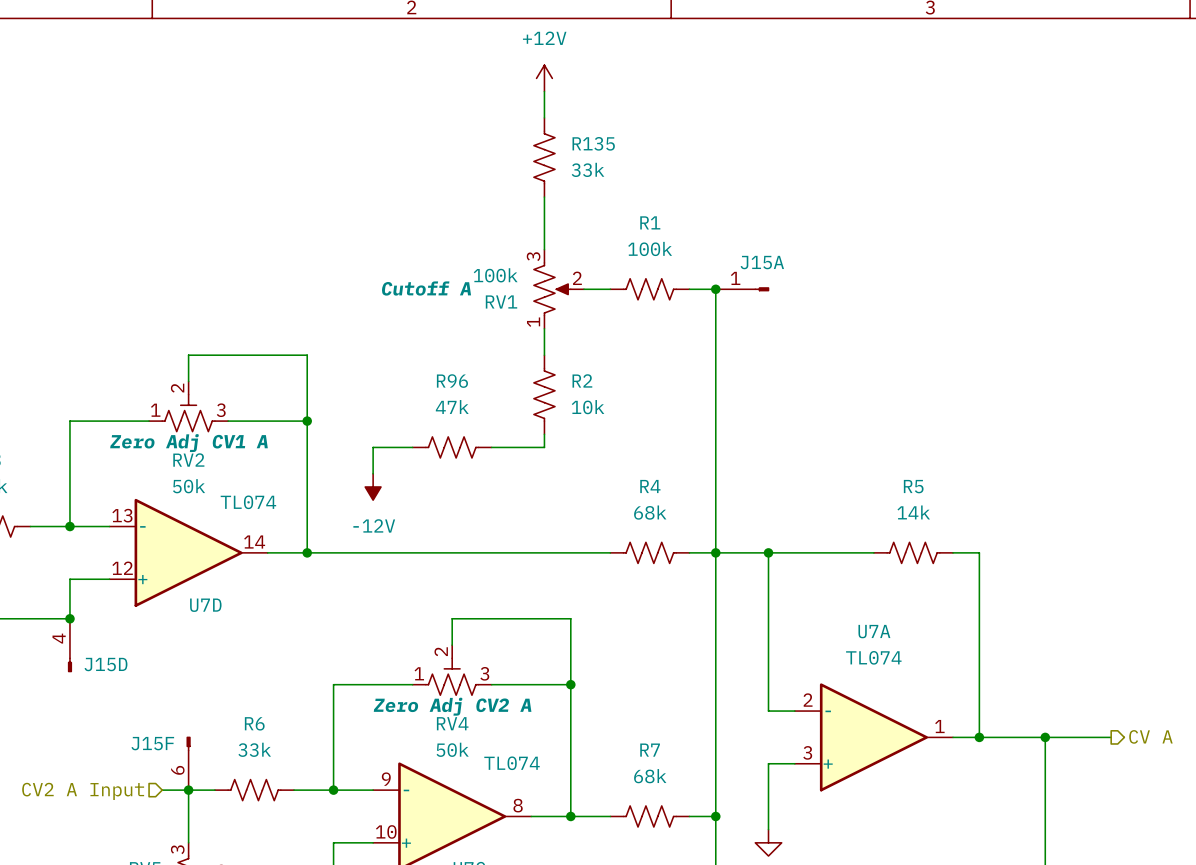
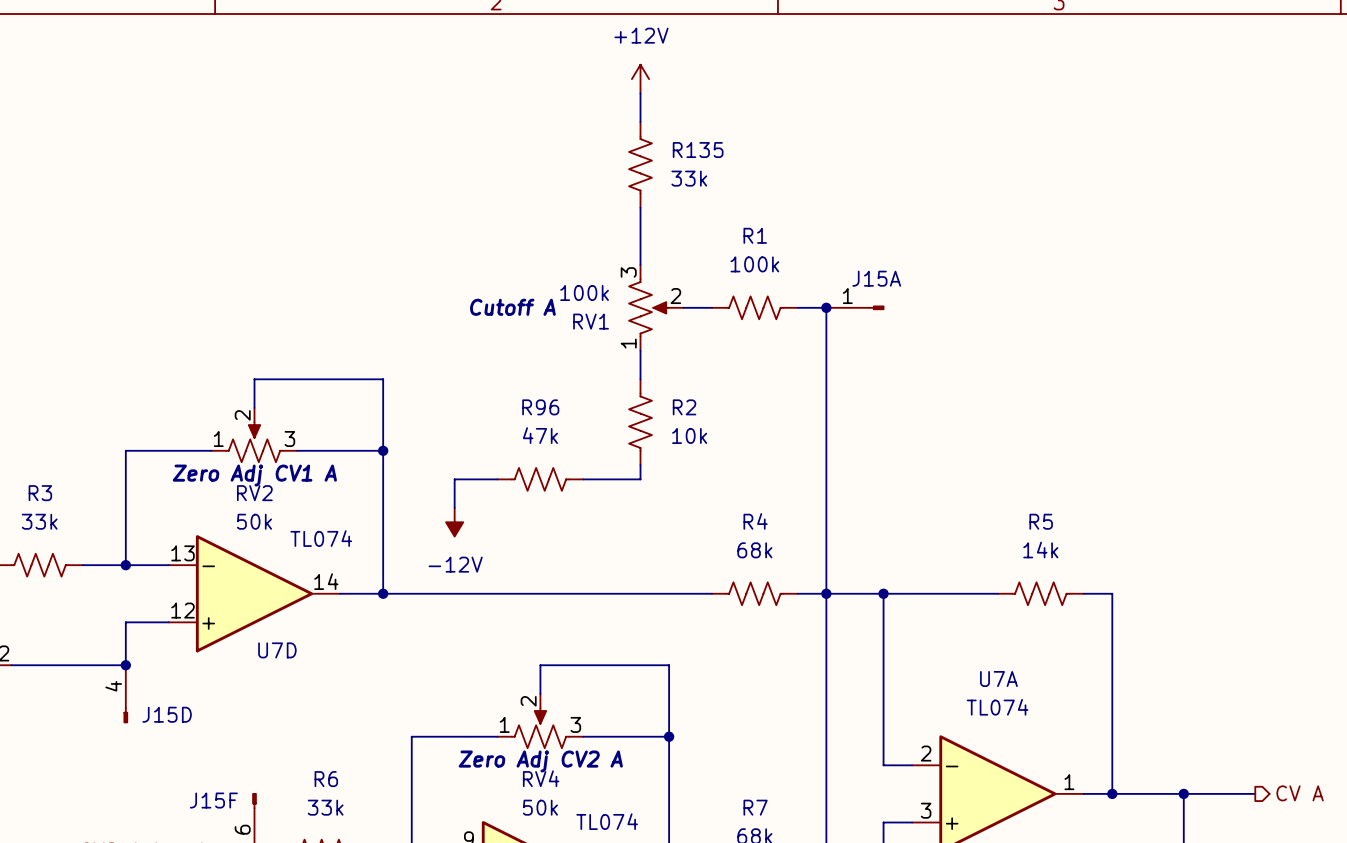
RV2 symbol: [149, 381, 229, 432] -> [211, 407, 298, 463]
RV4 symbol: [412, 645, 492, 696] -> [497, 693, 584, 749]

